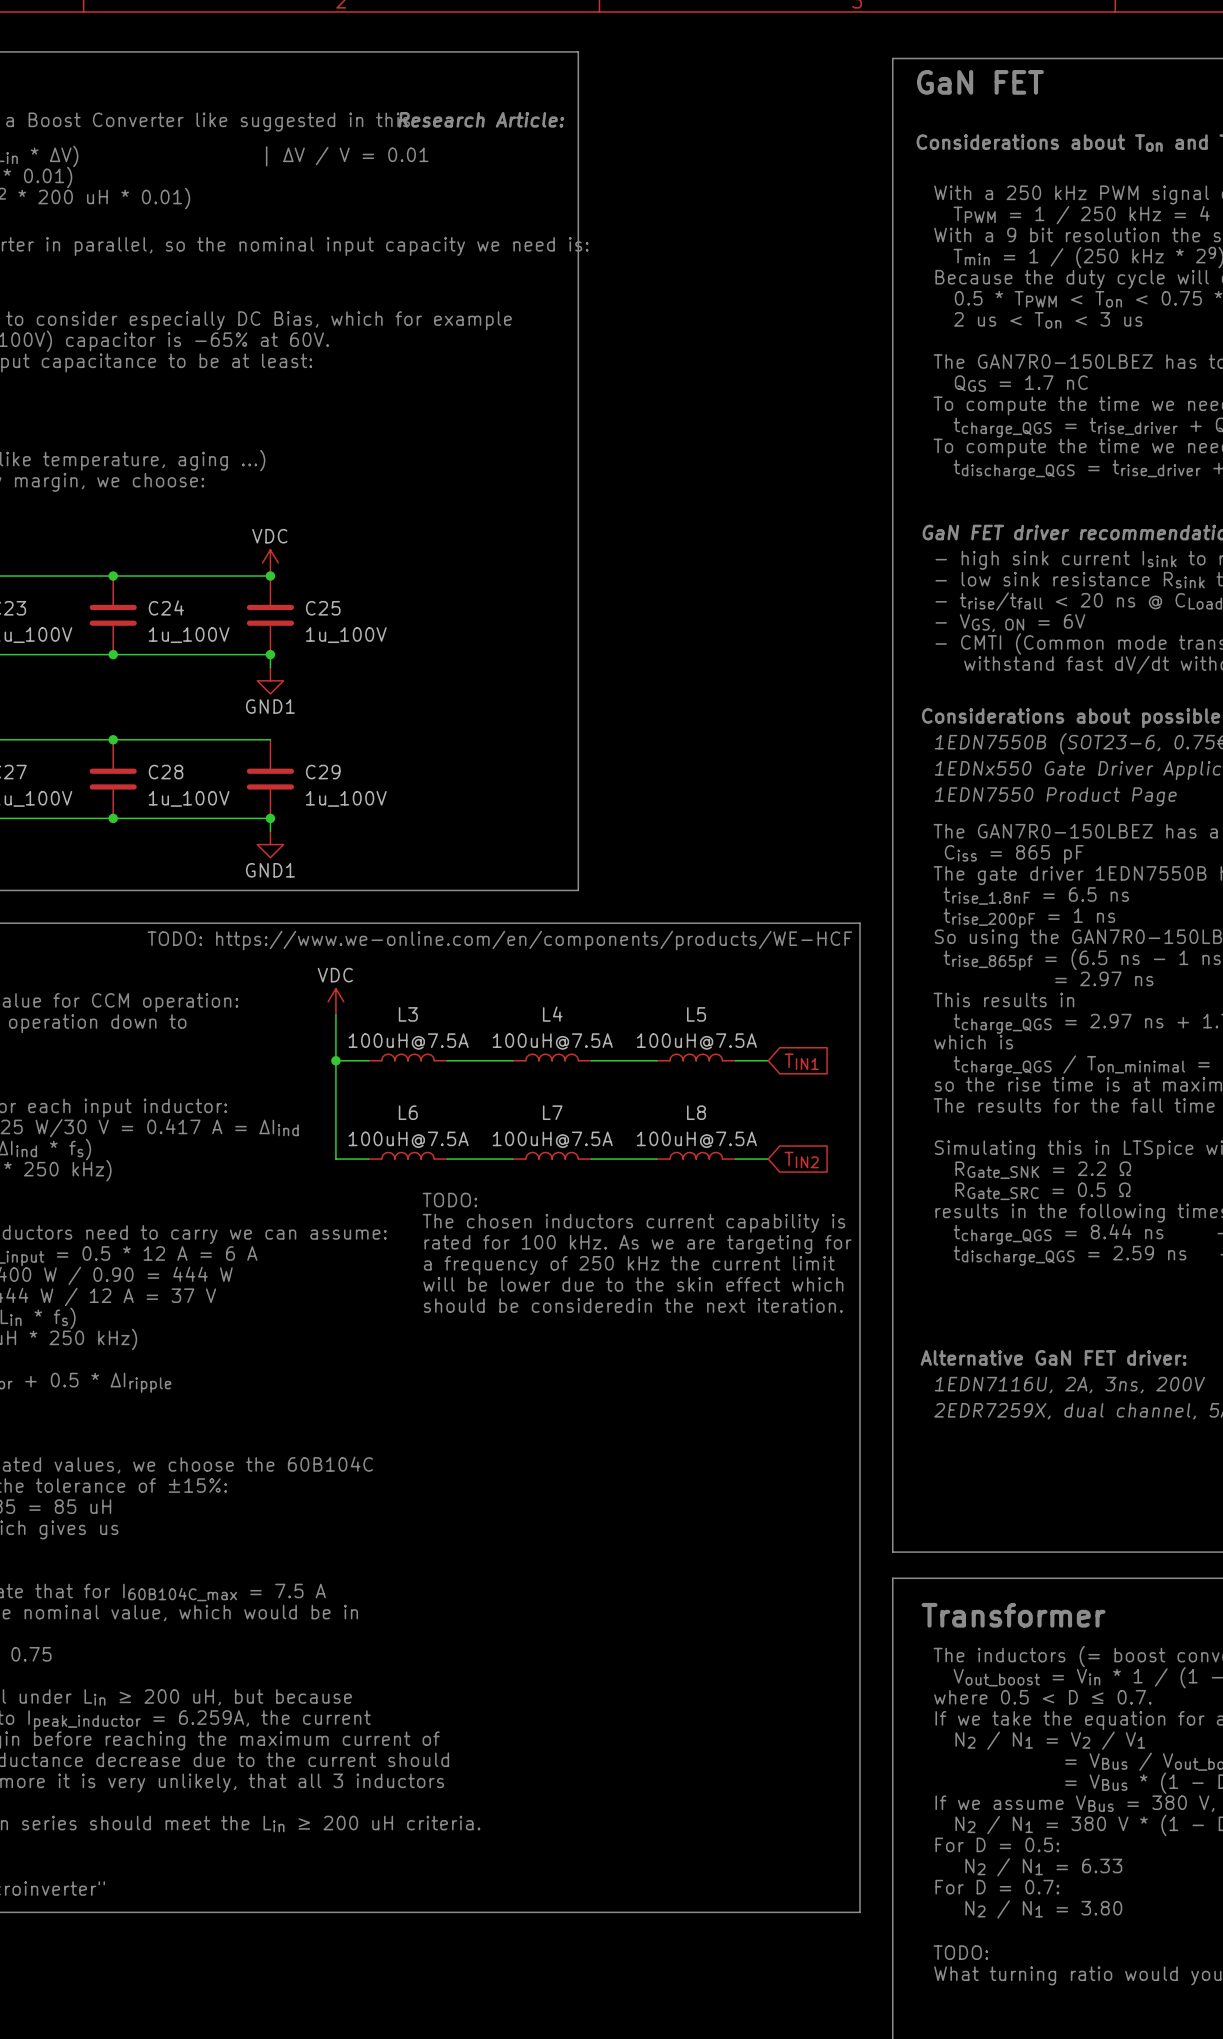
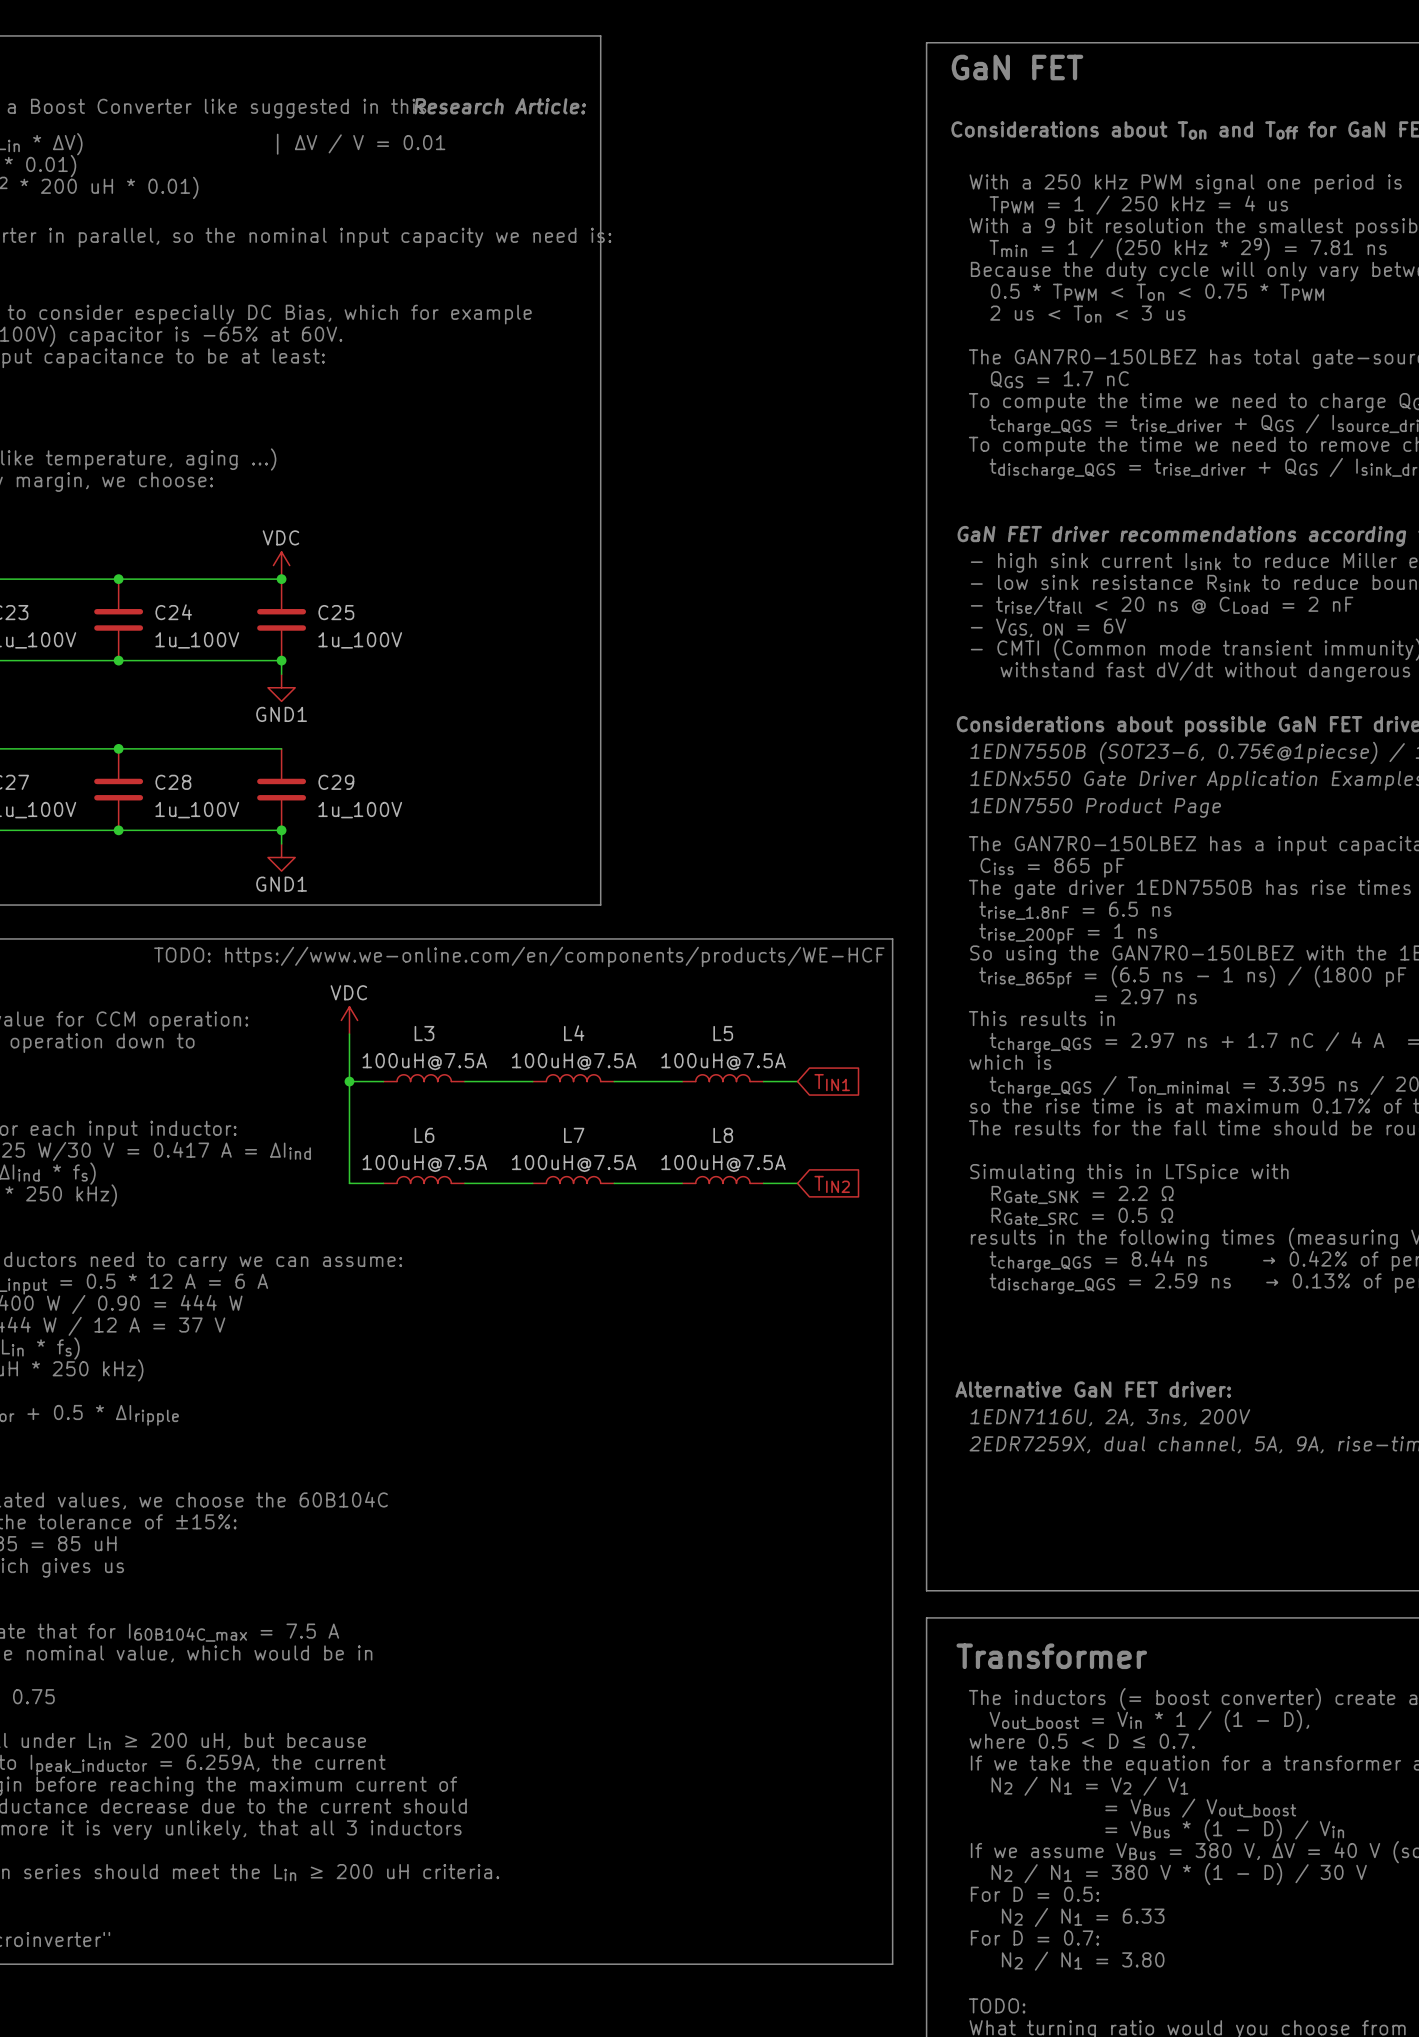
text: TODO: (449, 1200) -> none
text: The chosen inductors current capability is (633, 1223) -> none
text: rated for 100 kHz. As we are targeting for (638, 1244) -> none
text: a frequency of 250 kHz the current limit (629, 1265) -> none
text: will be lower due to the skin effect which (633, 1284) -> none
text: should be consideredin the next iteration. (633, 1305) -> none

